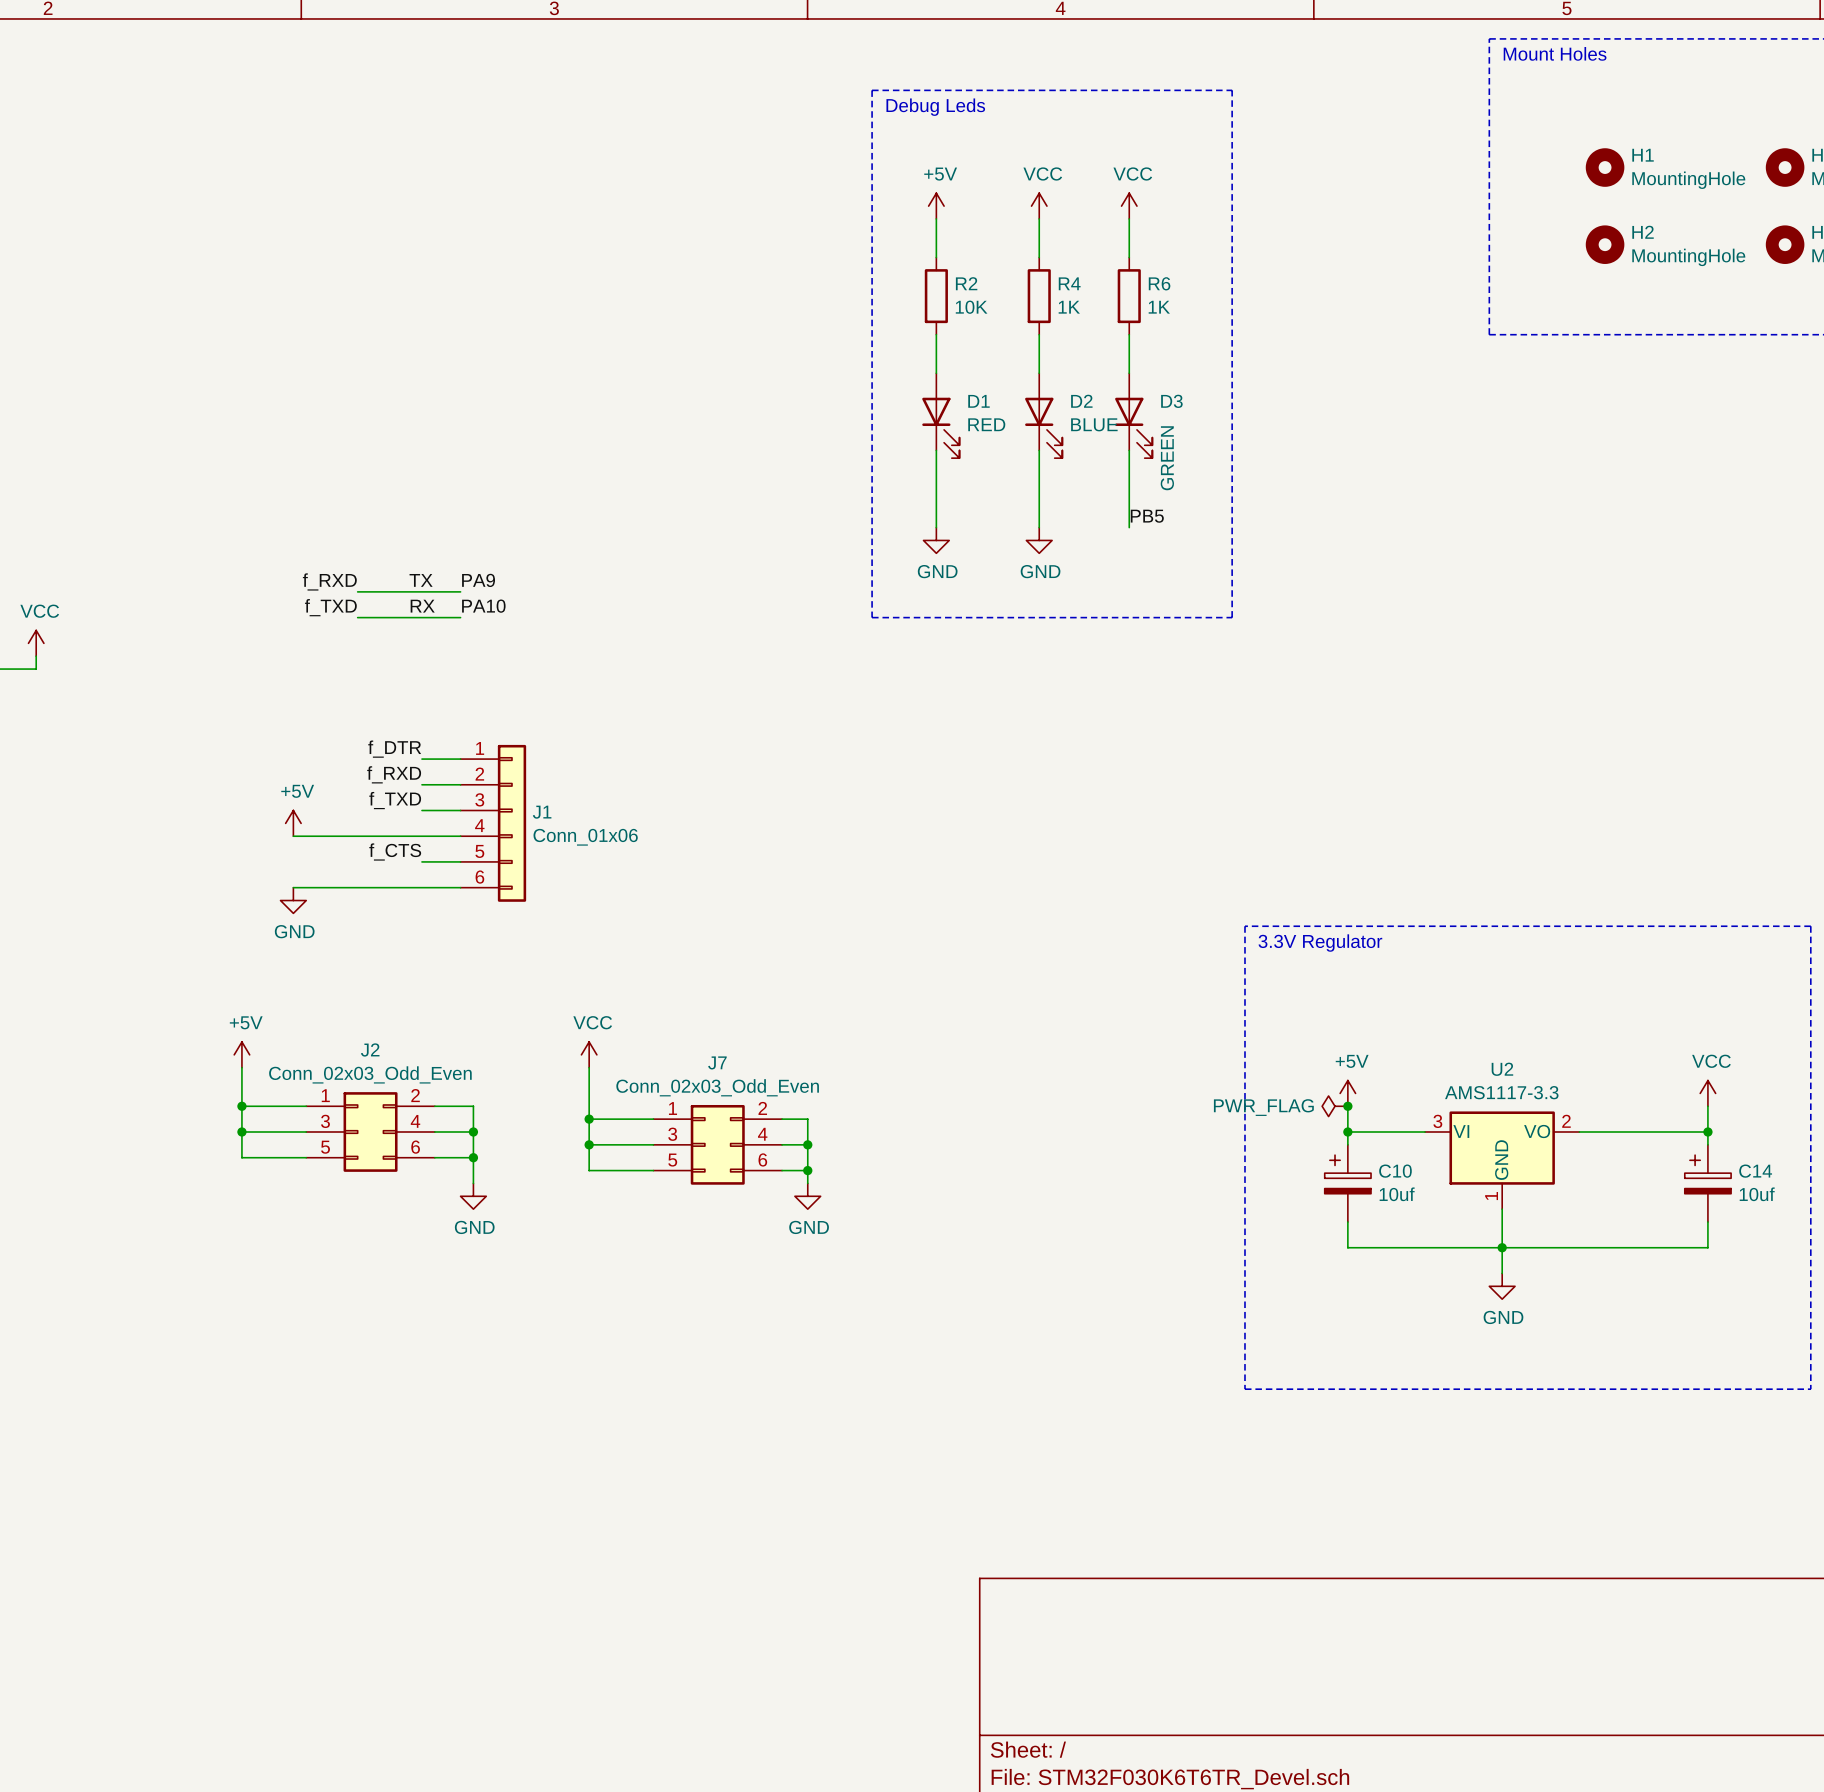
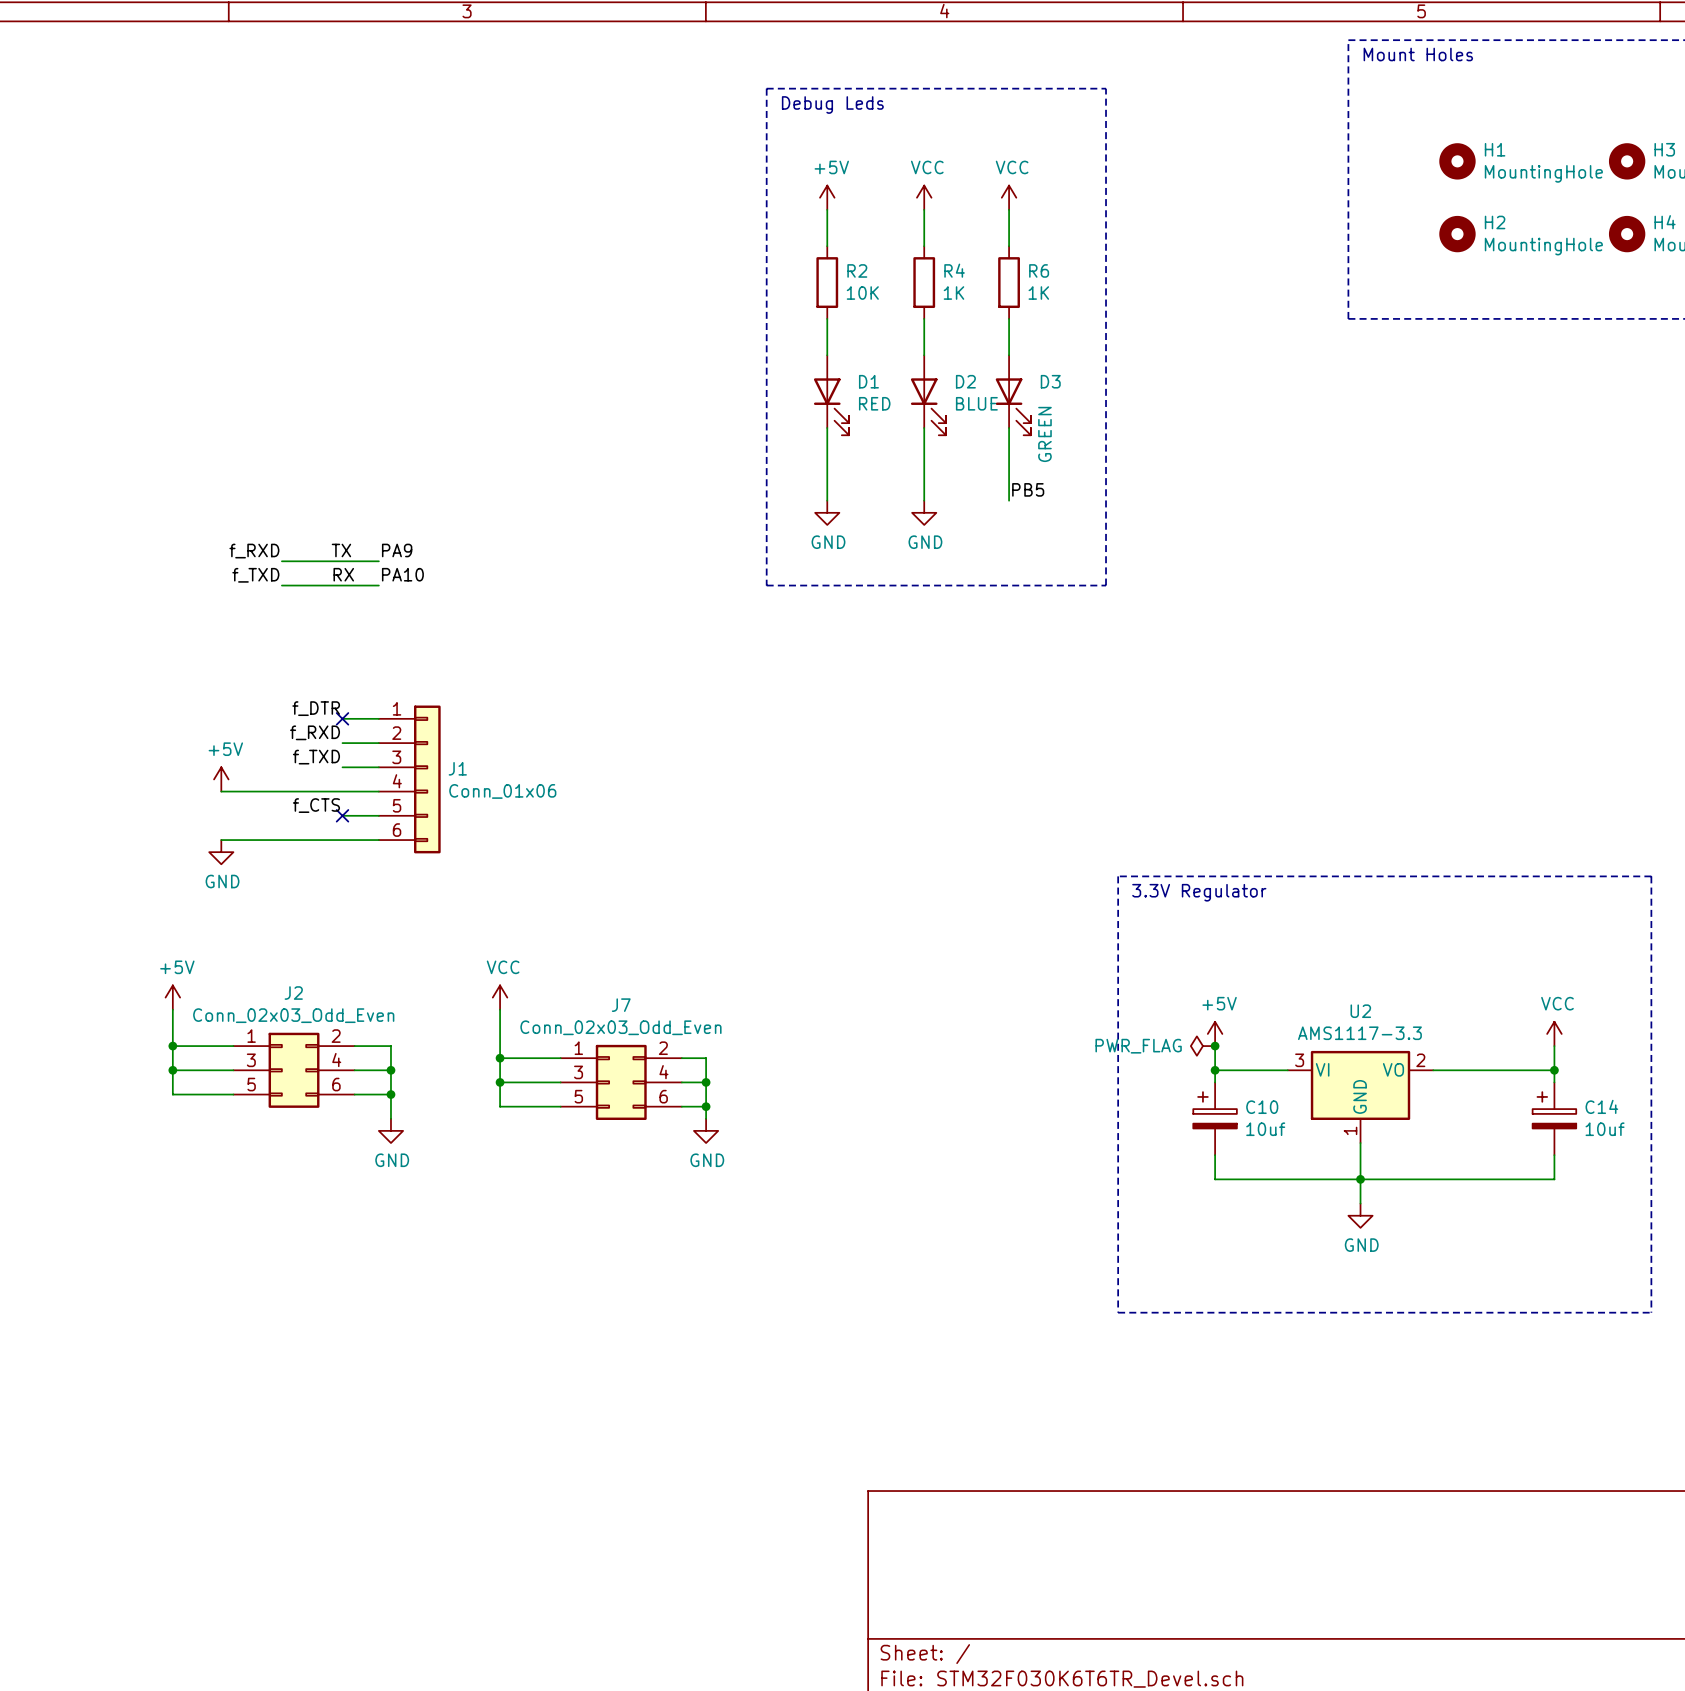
no-connect mark: none -> (342, 718)
no-connect mark: none -> (342, 815)

